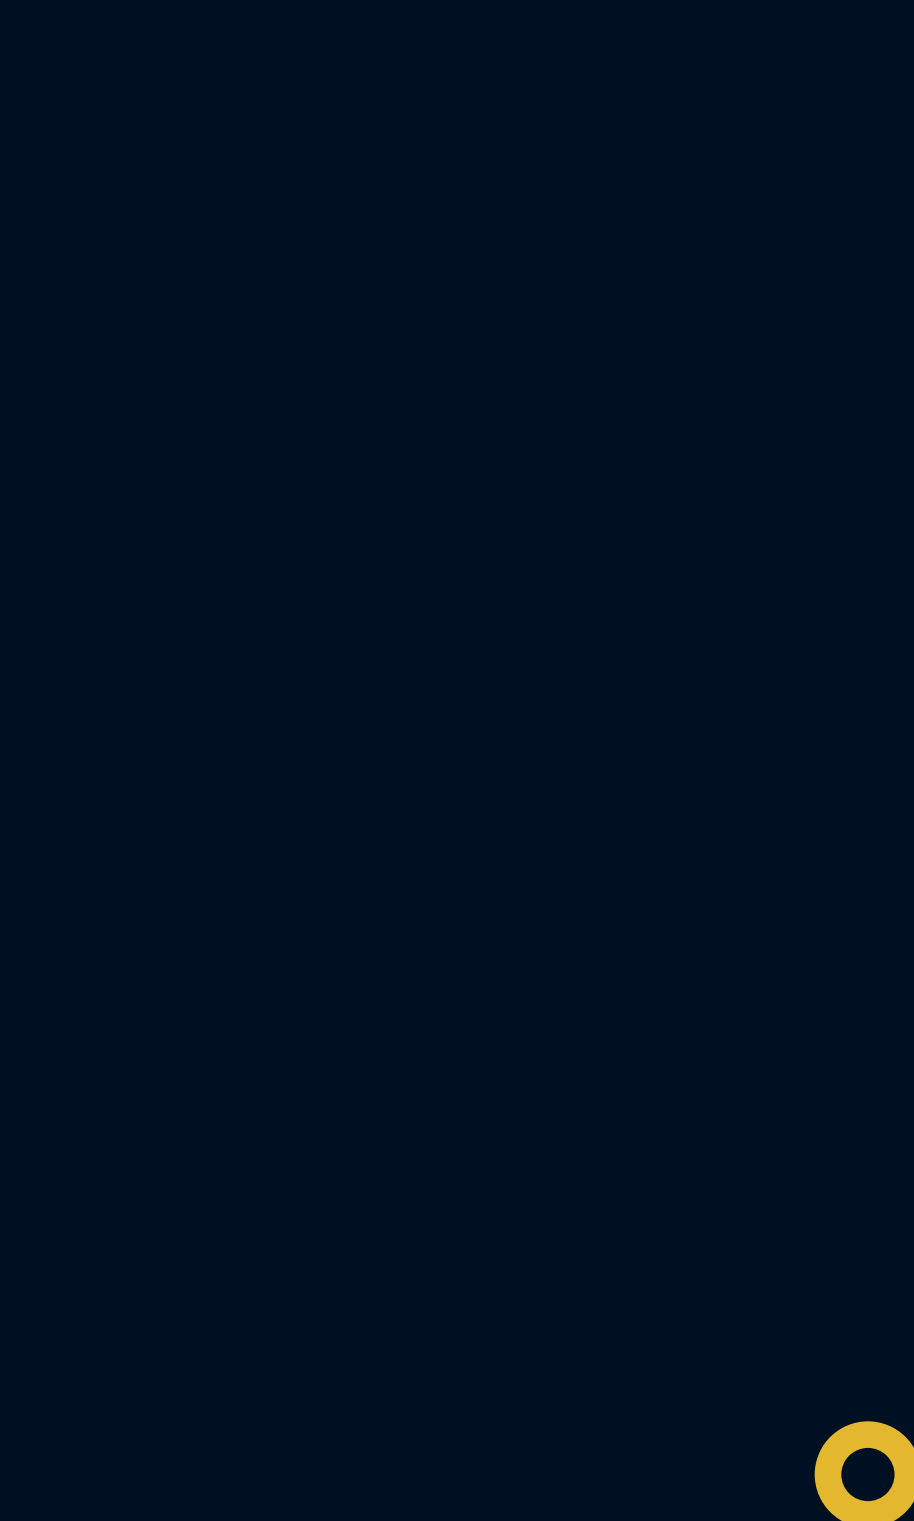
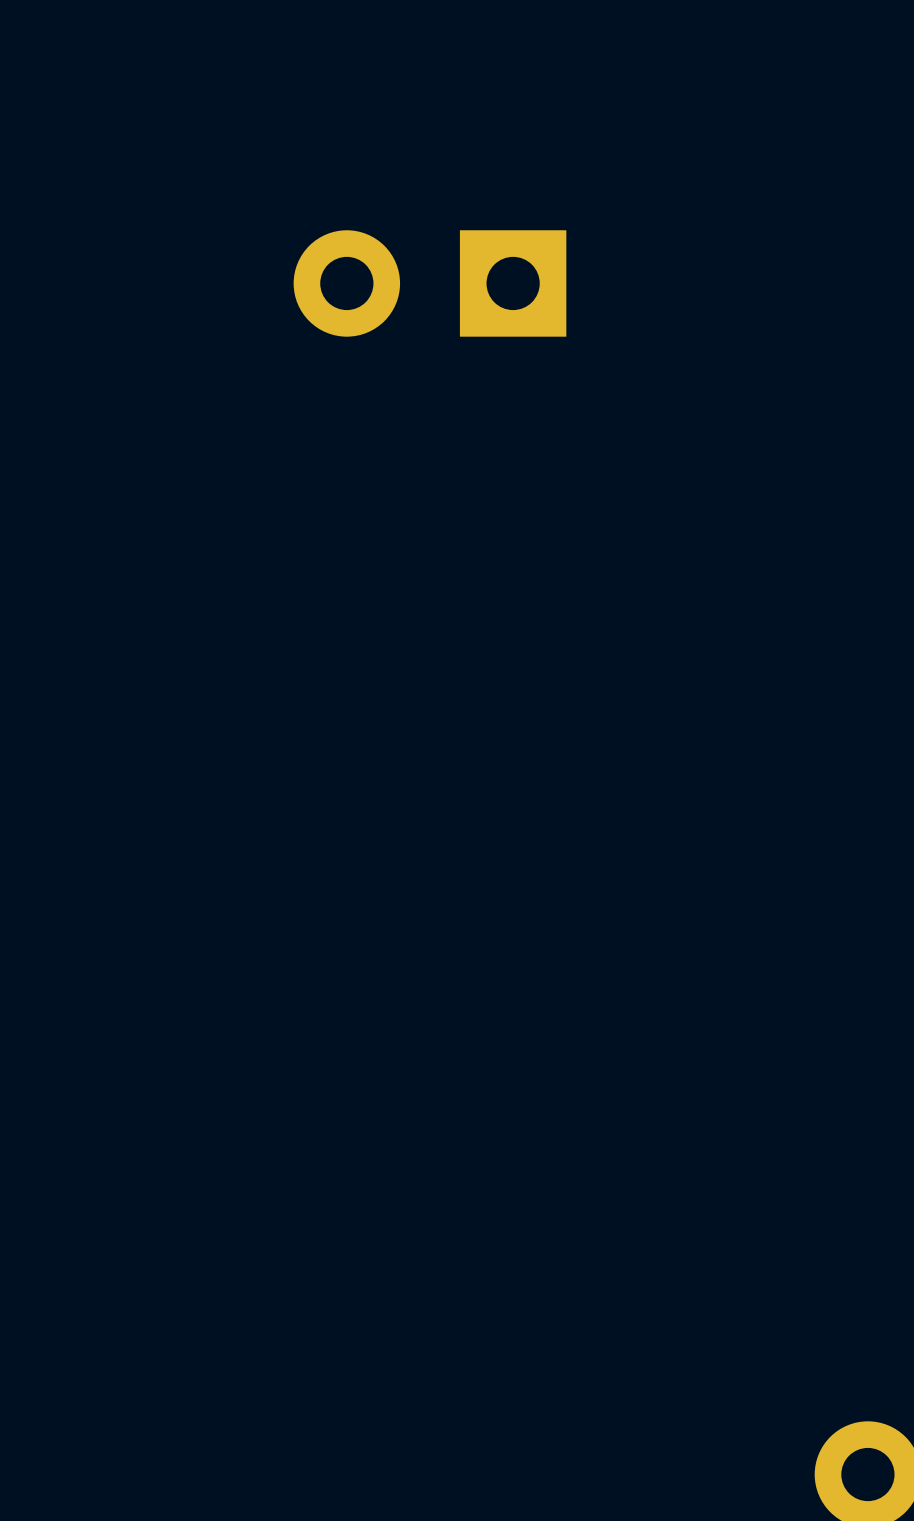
part: none -> (429, 283)

